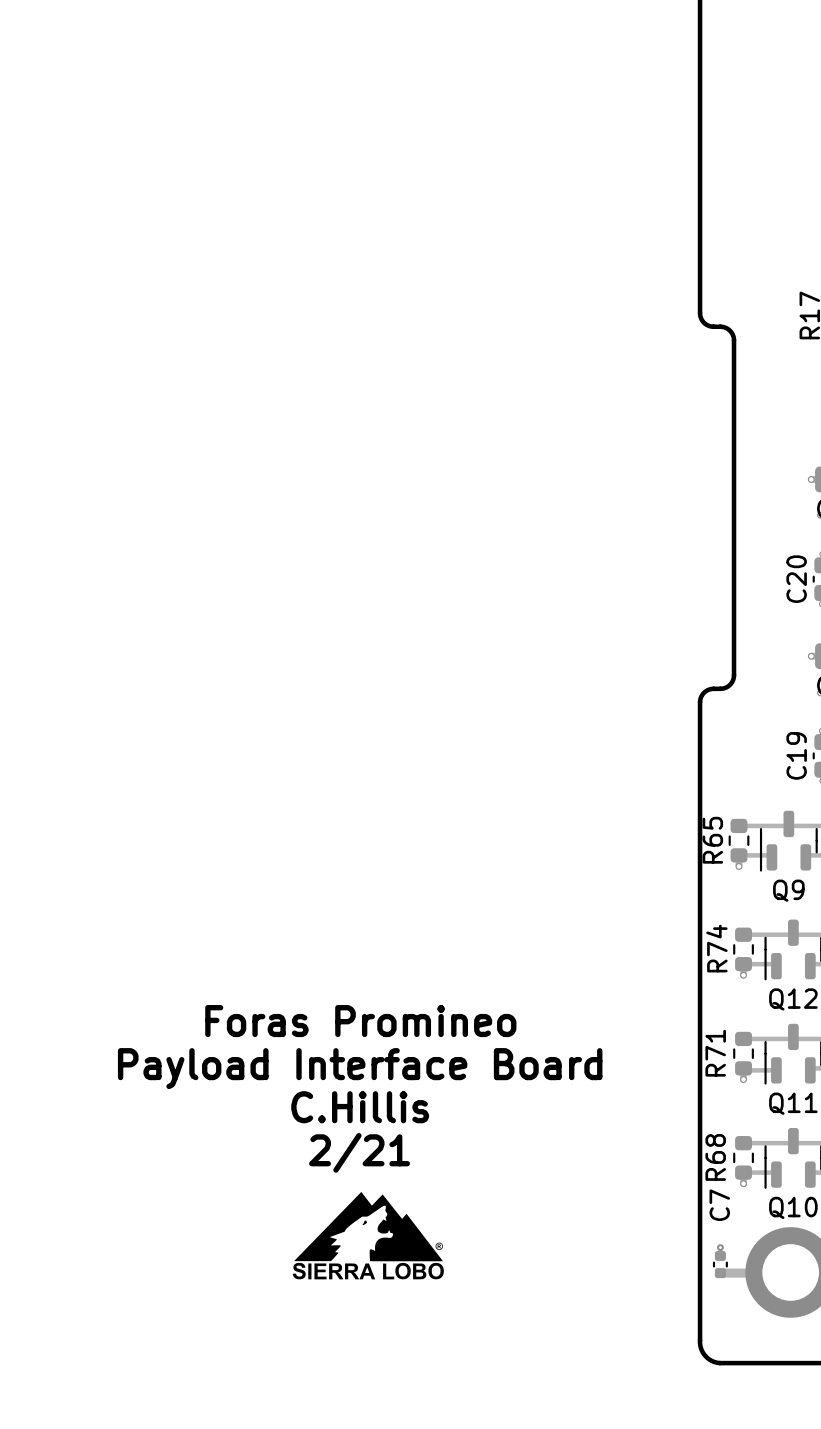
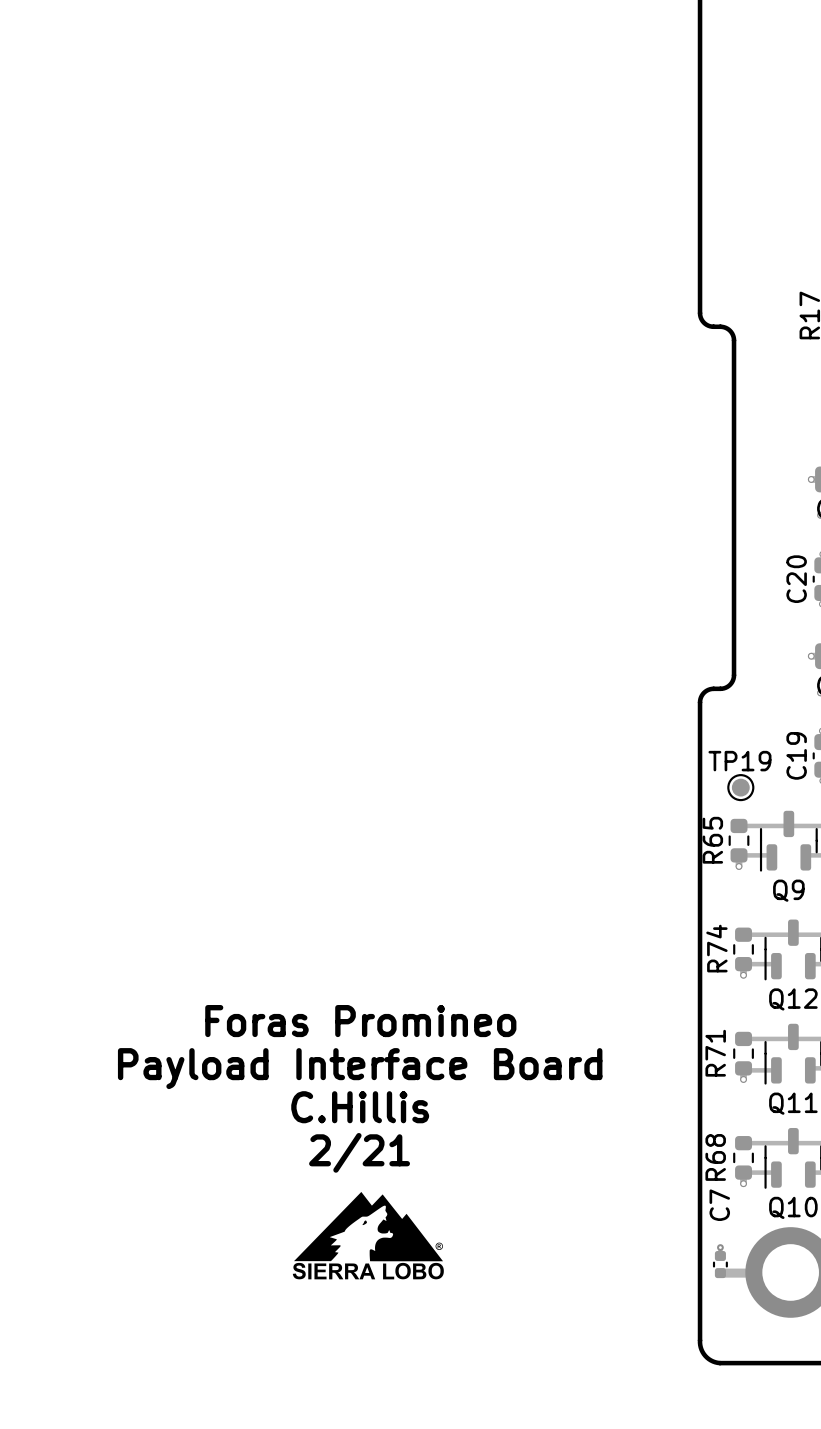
TP19: none -> (740, 787)

